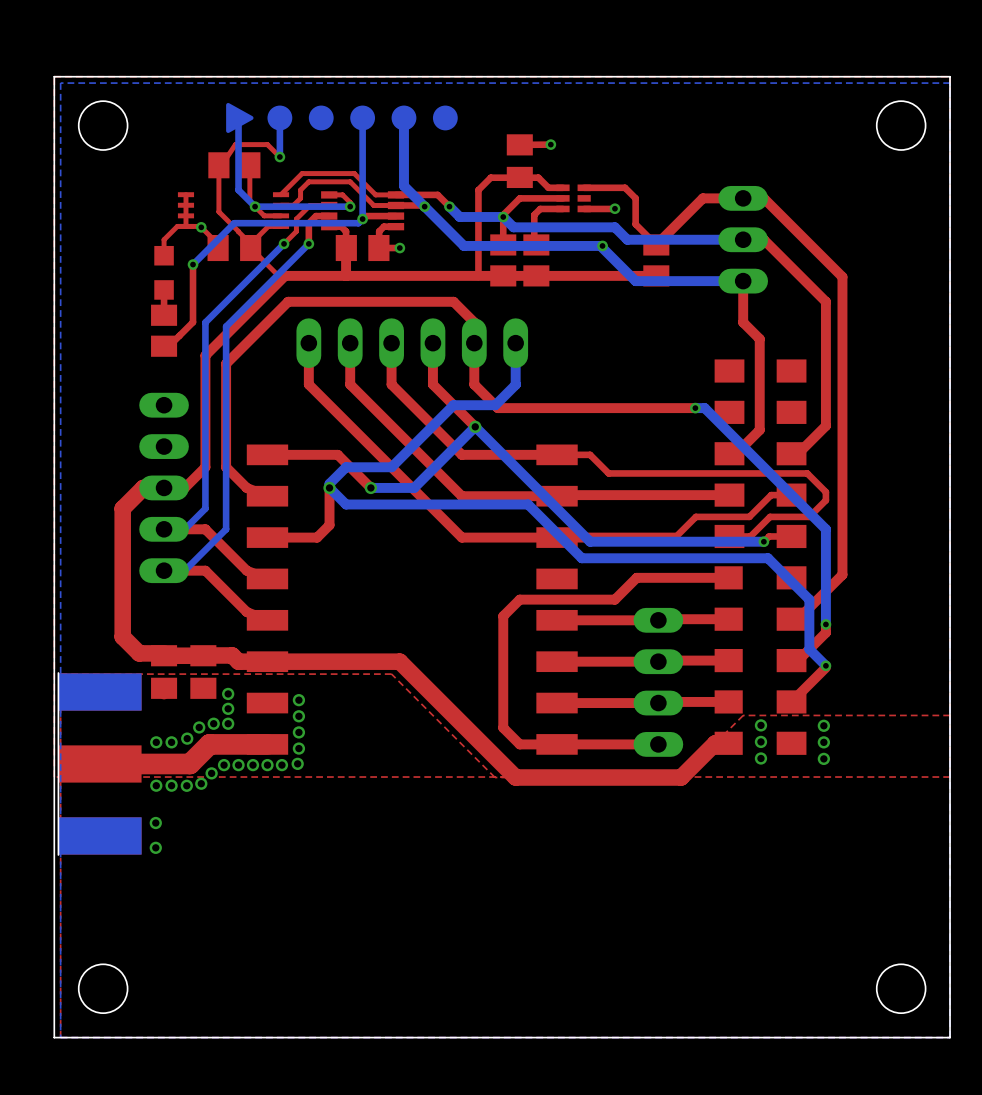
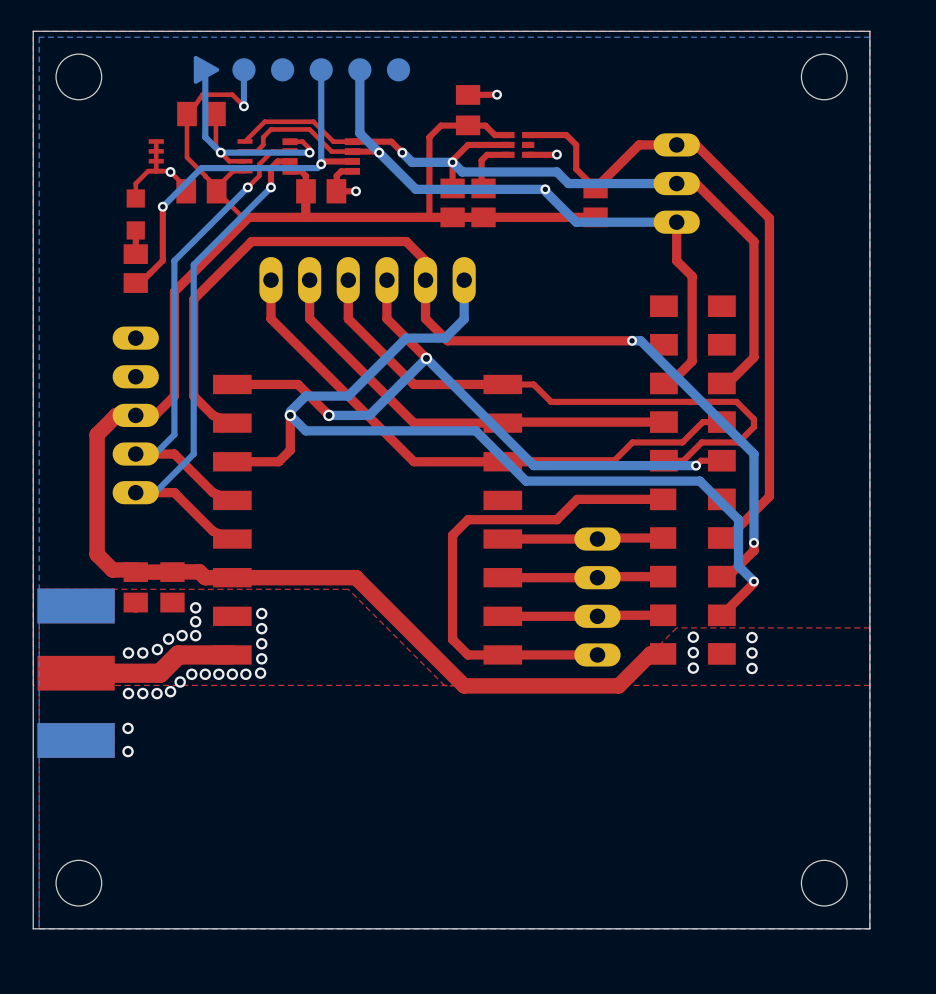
part footprint: [58, 672, 142, 855] -> [37, 588, 115, 758]

